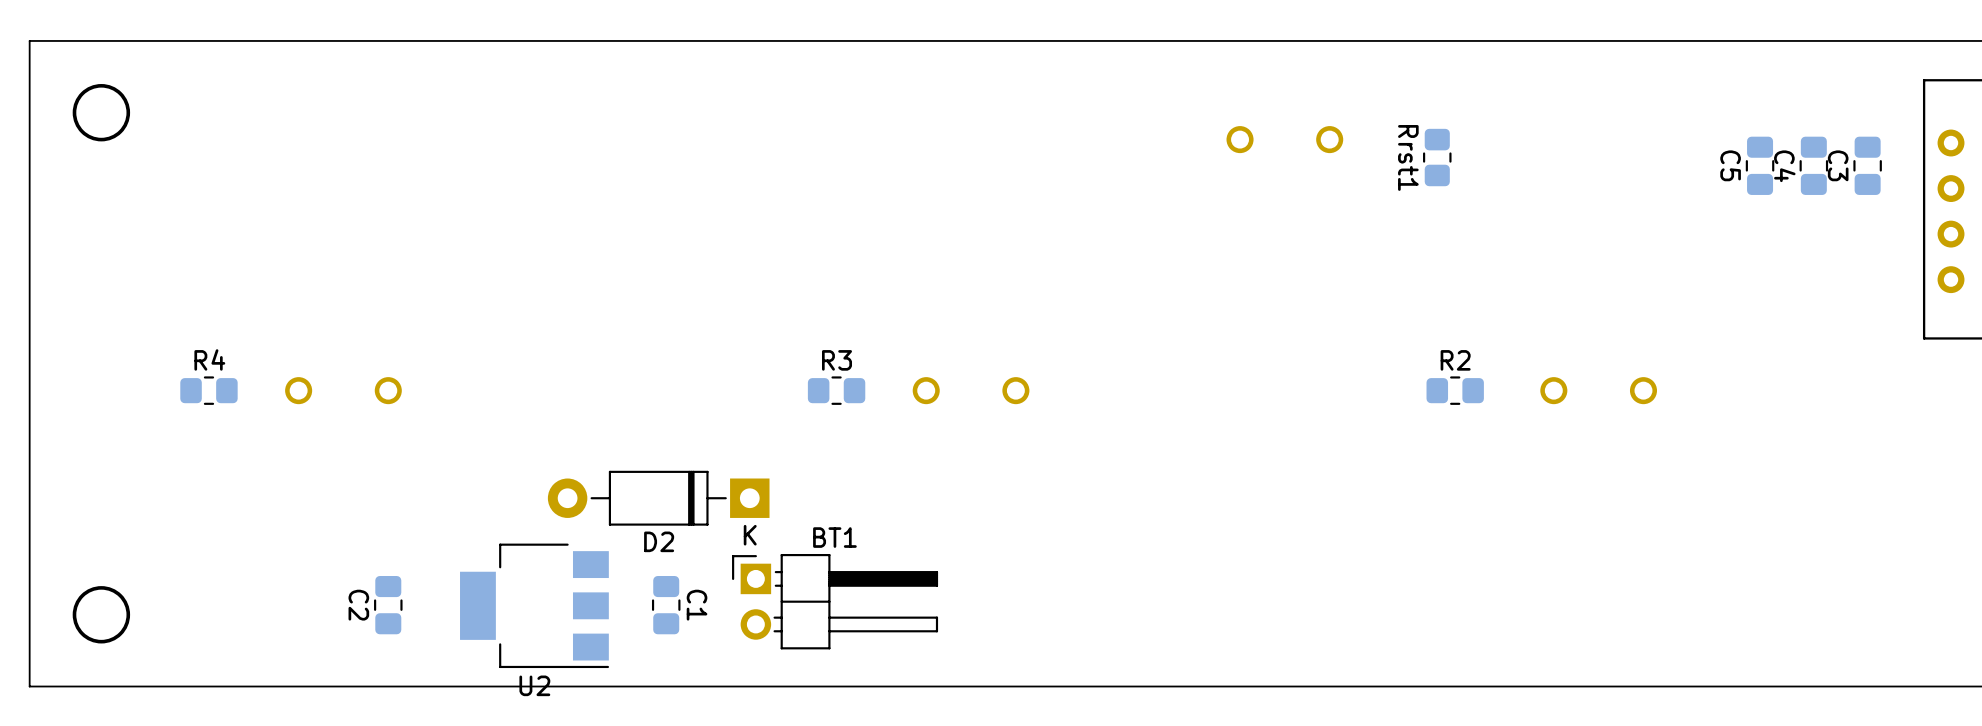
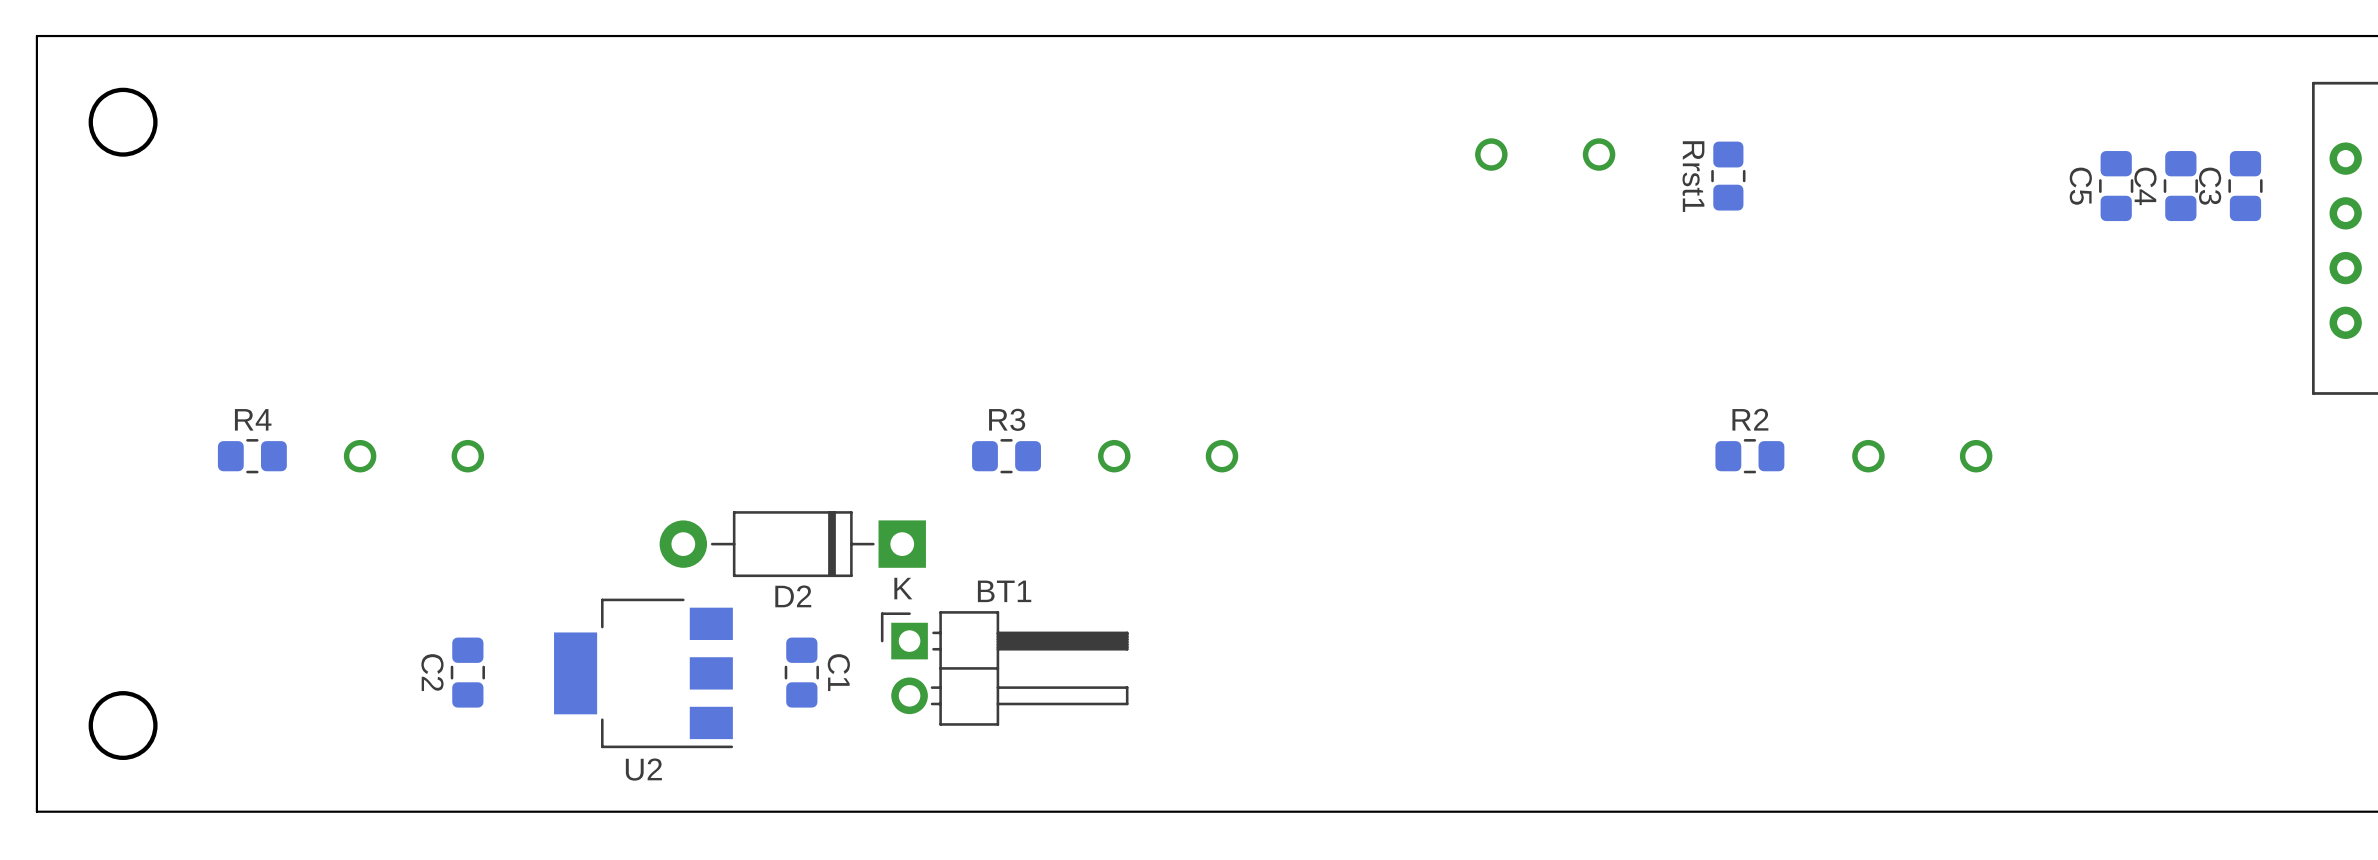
D2 position: (658, 498) -> (792, 544)
BT1 position: (835, 601) -> (1004, 668)
C2 position: (388, 605) -> (467, 672)
U2 position: (534, 605) -> (643, 673)
C1 position: (666, 605) -> (801, 672)

